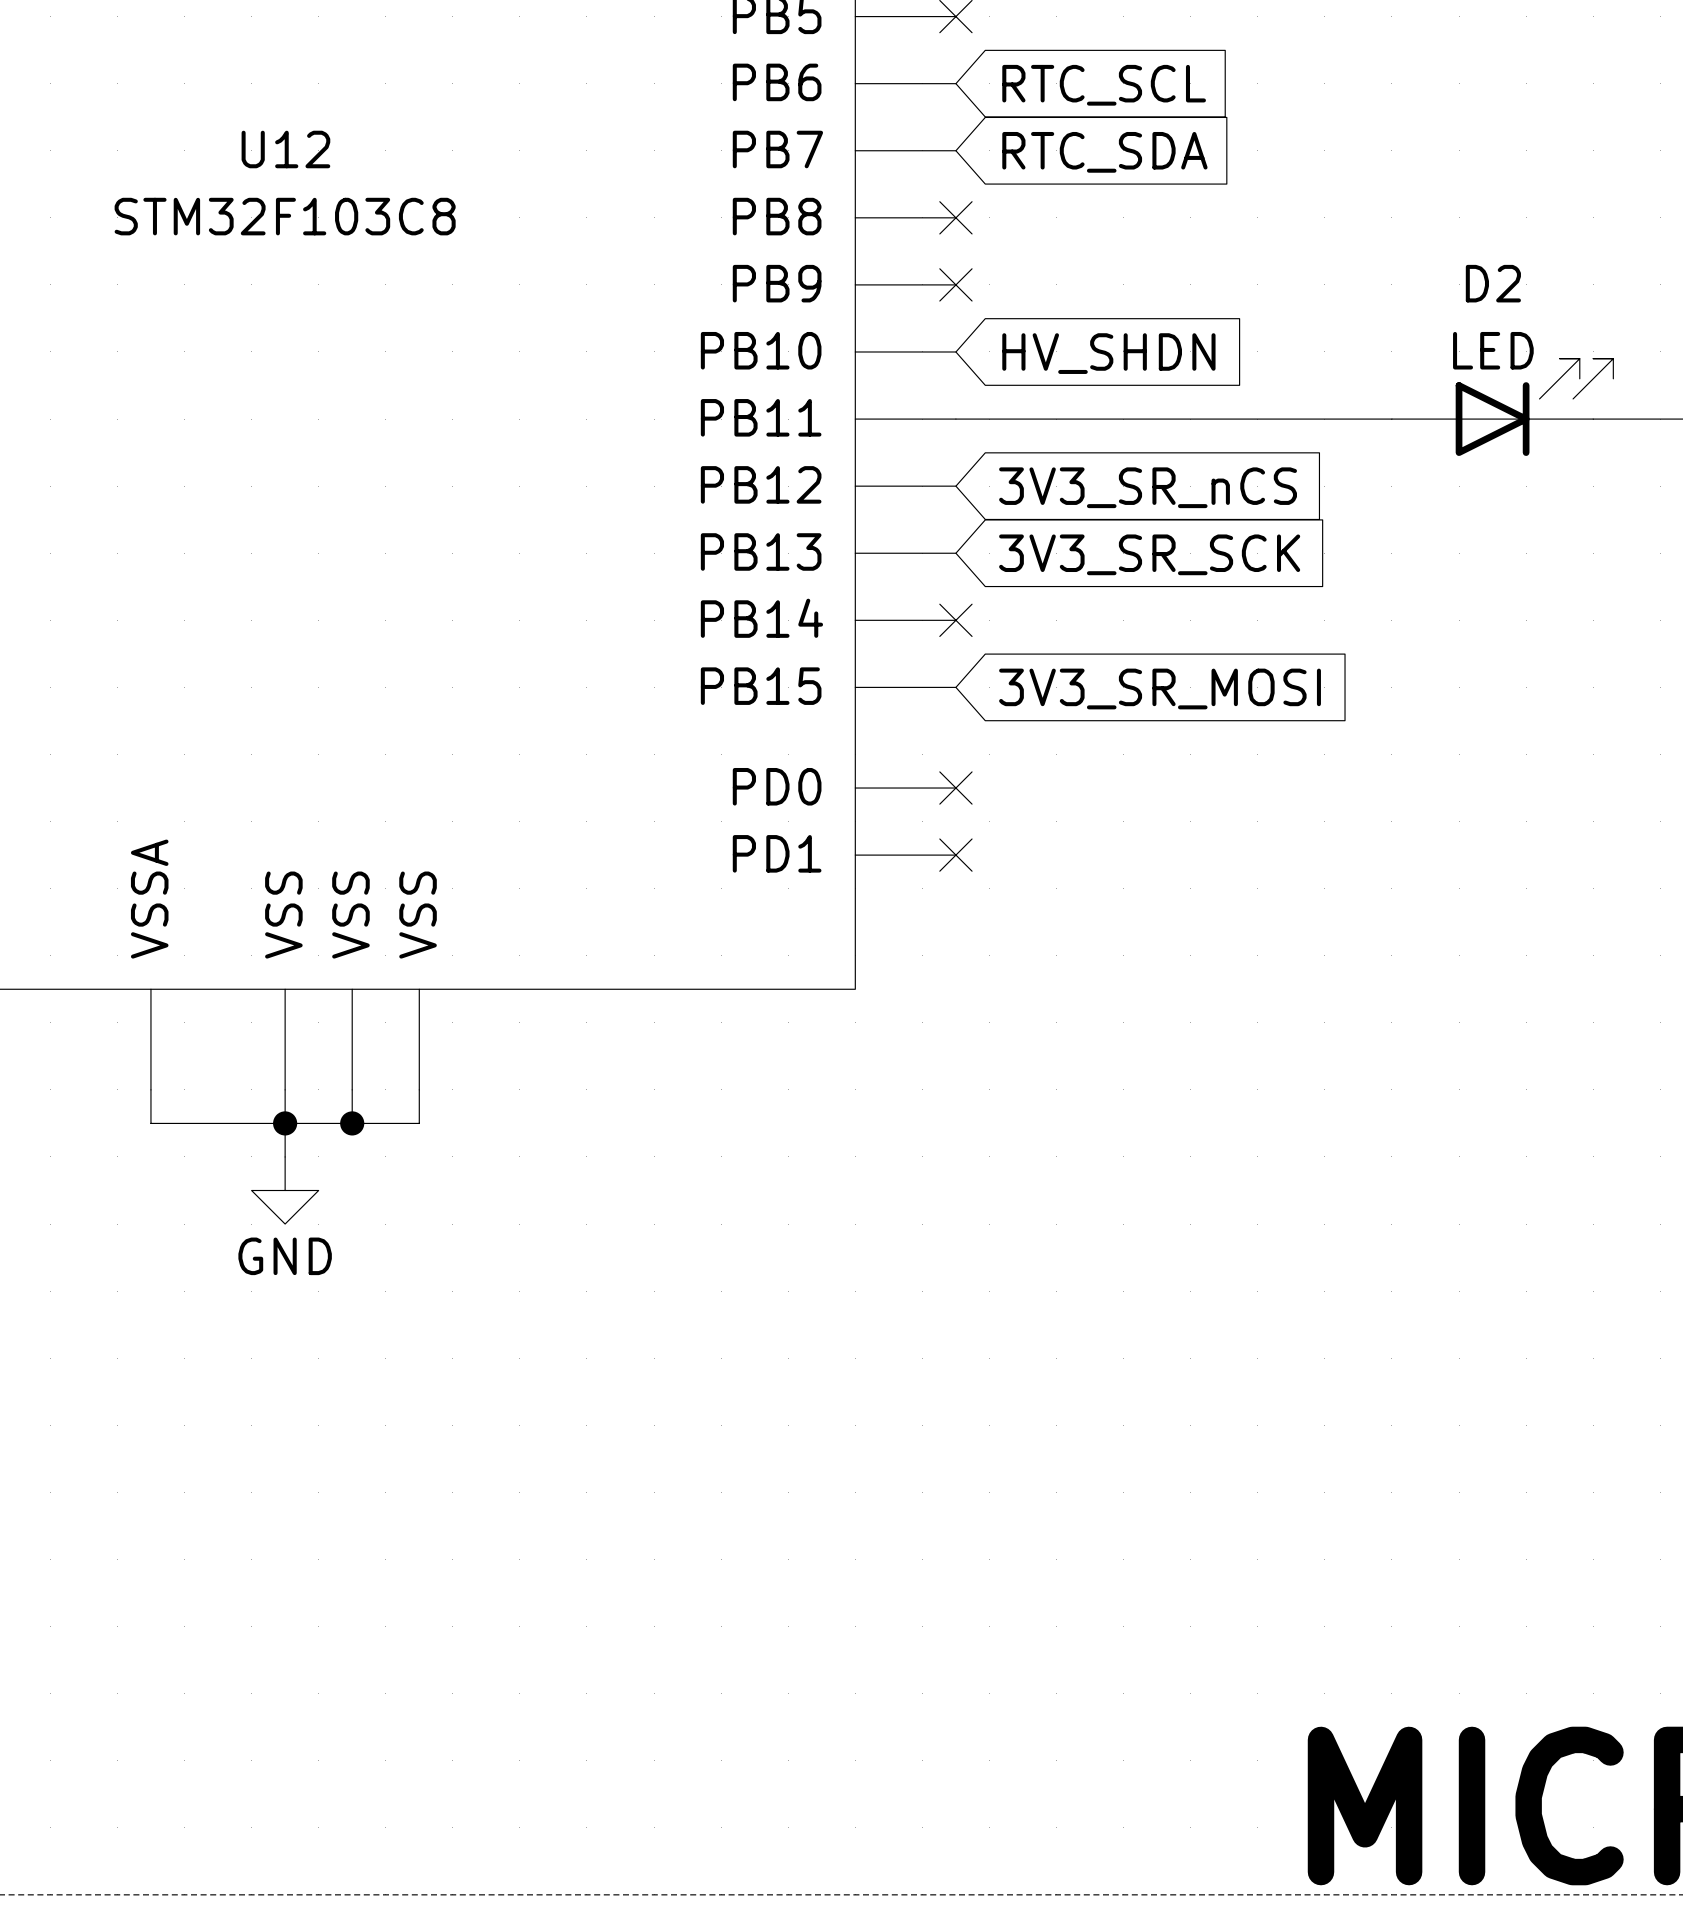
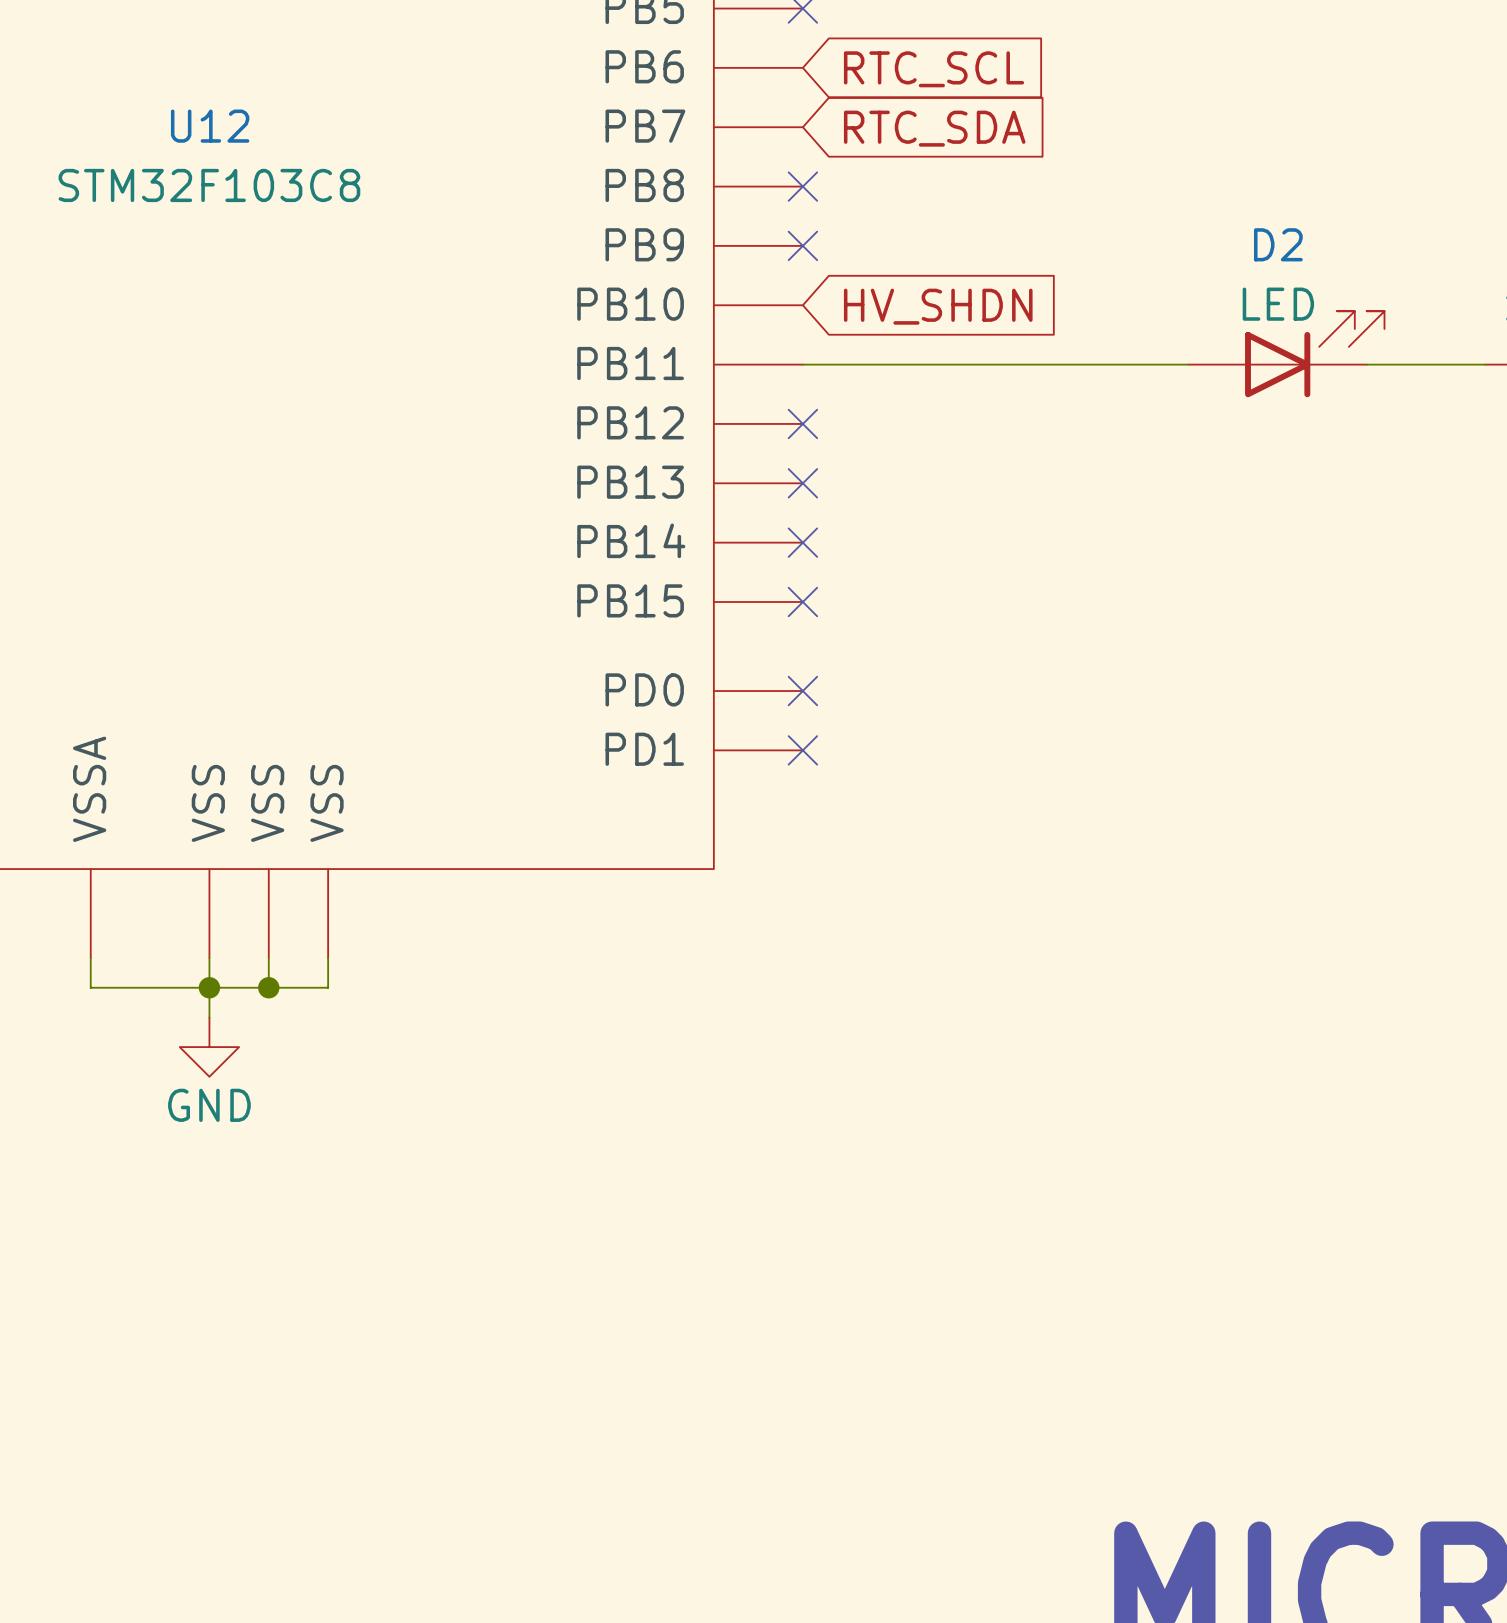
no-connect mark: none -> (802, 423)
global label: 3V3_SR_nCS (1148, 487) -> none
no-connect mark: none -> (802, 483)
global label: 3V3_SR_SCK (1149, 554) -> none
no-connect mark: none -> (802, 602)
global label: 3V3_SR_MOSI (1160, 688) -> none

